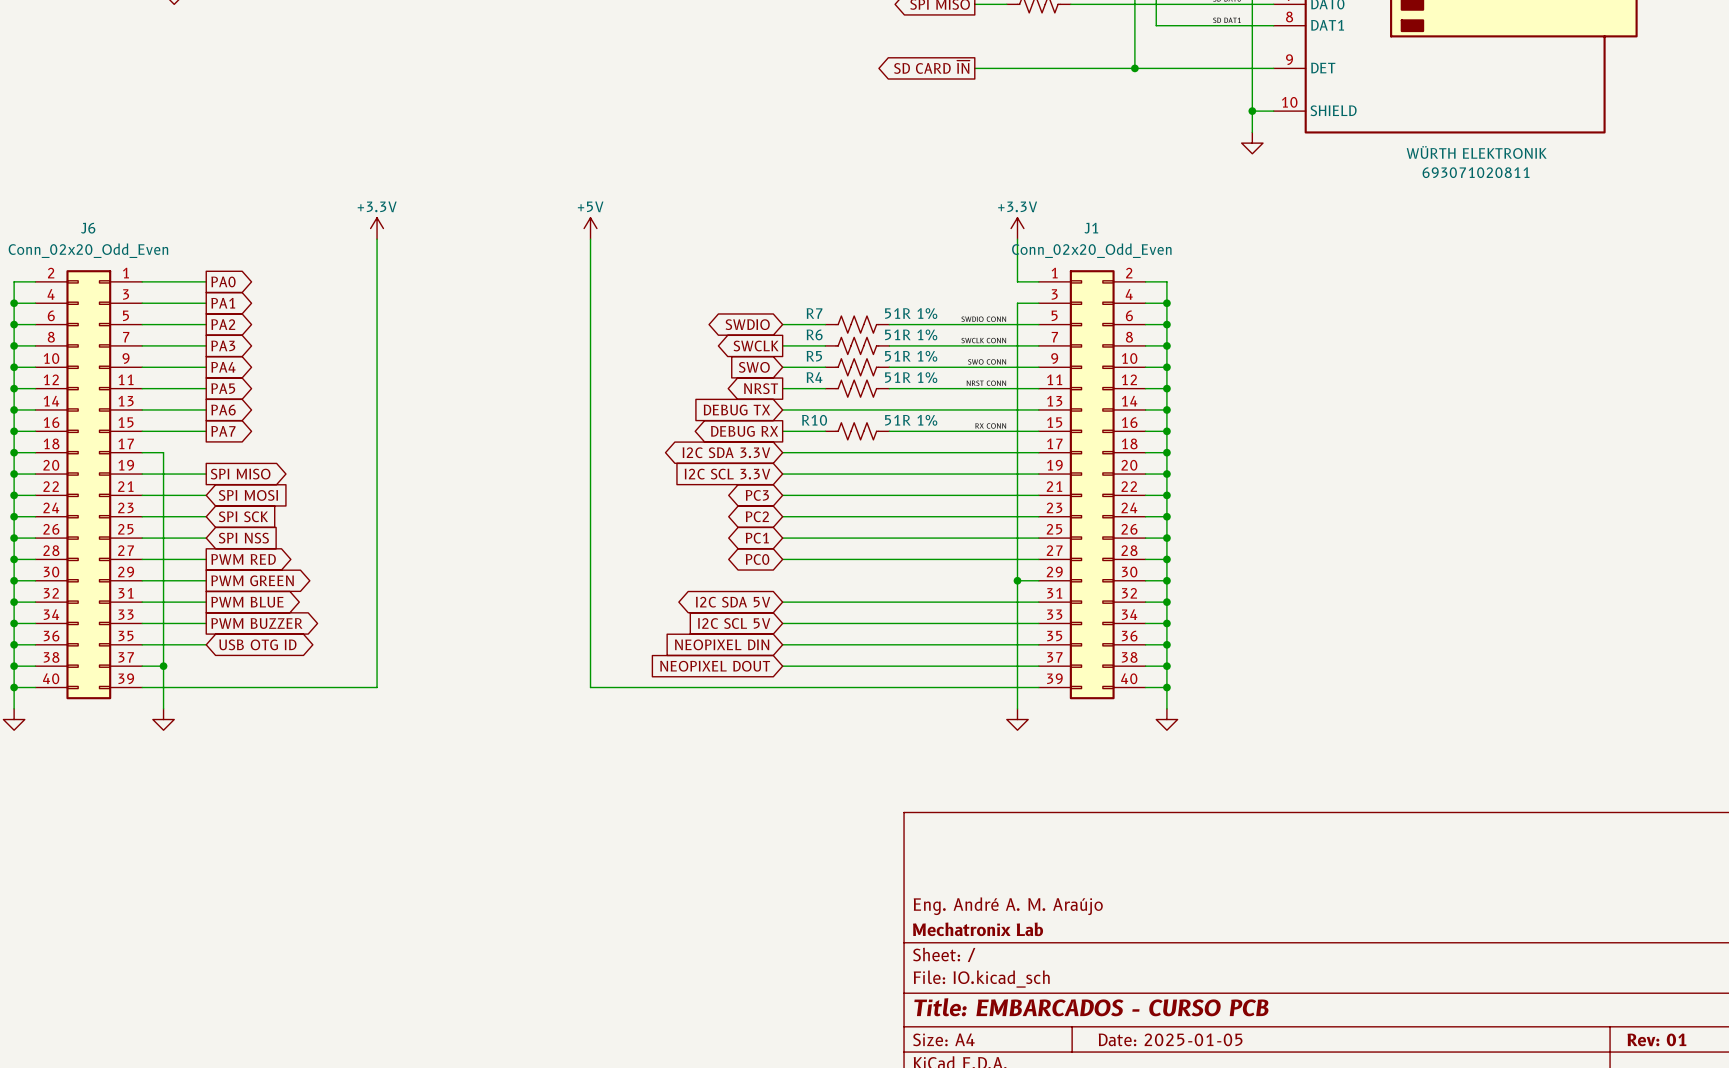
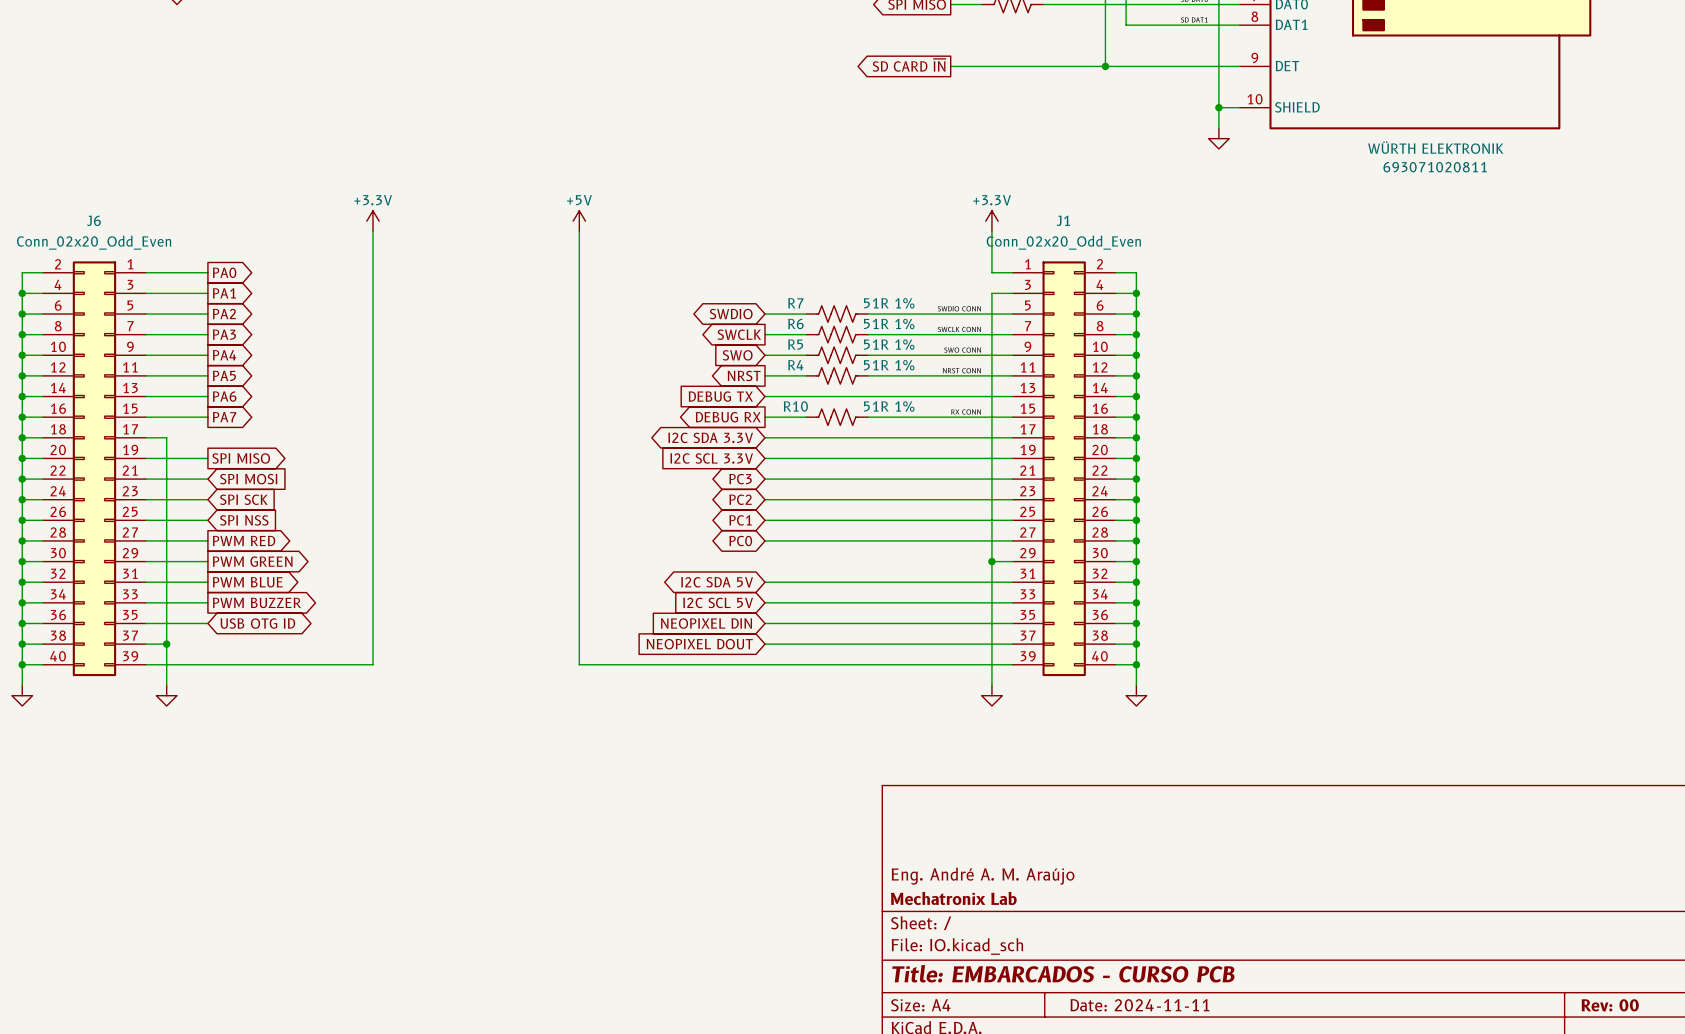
title block: Date: 2025-01-05 (1170, 1039) -> Date: 2024-11-11 (1139, 1005)
title block: Rev: 01 (1656, 1039) -> Rev: 00 (1610, 1005)

